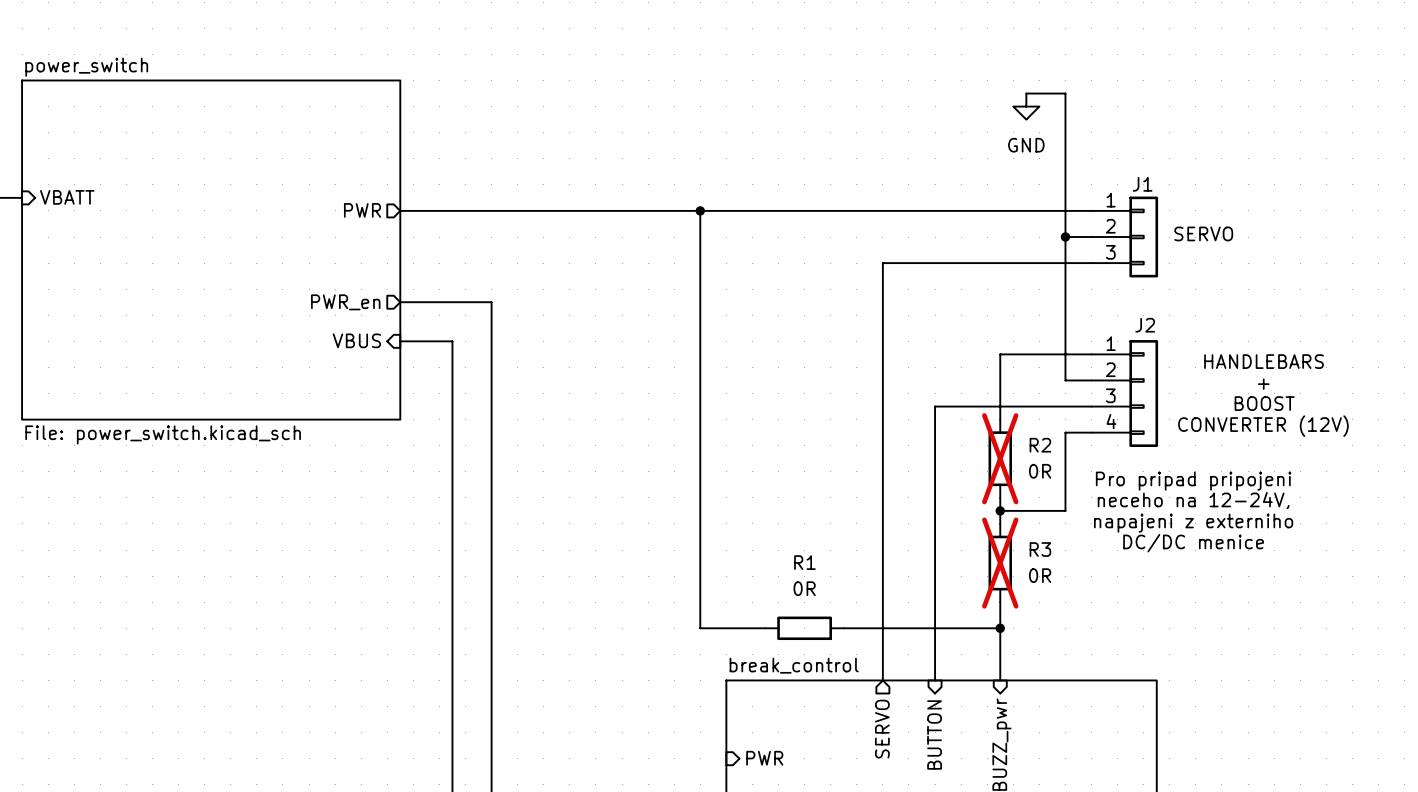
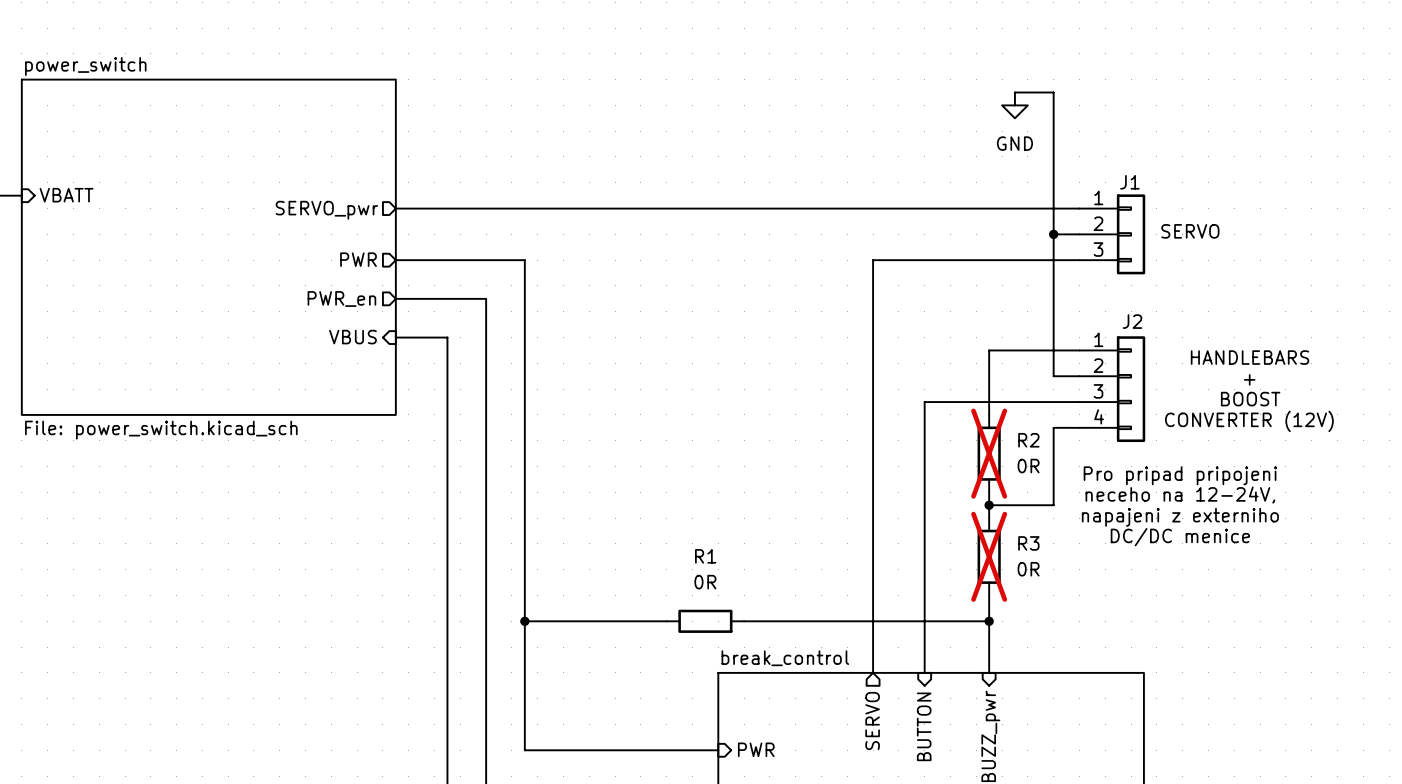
sheet pin: PWR (362, 210) -> SERVO_pwr (326, 210)
wire: (700, 210) (700, 628) (752, 628) -> none
junction: (700, 210) -> none
sheet pin: none -> PWR (358, 259)
wire: none -> (395, 260) (524, 260) (524, 750) (718, 750)
wire: none -> (524, 621) (666, 621)
junction: none -> (524, 621)
wire: none -> (757, 621) (834, 621)
R1 position: (804, 628) -> (705, 621)

